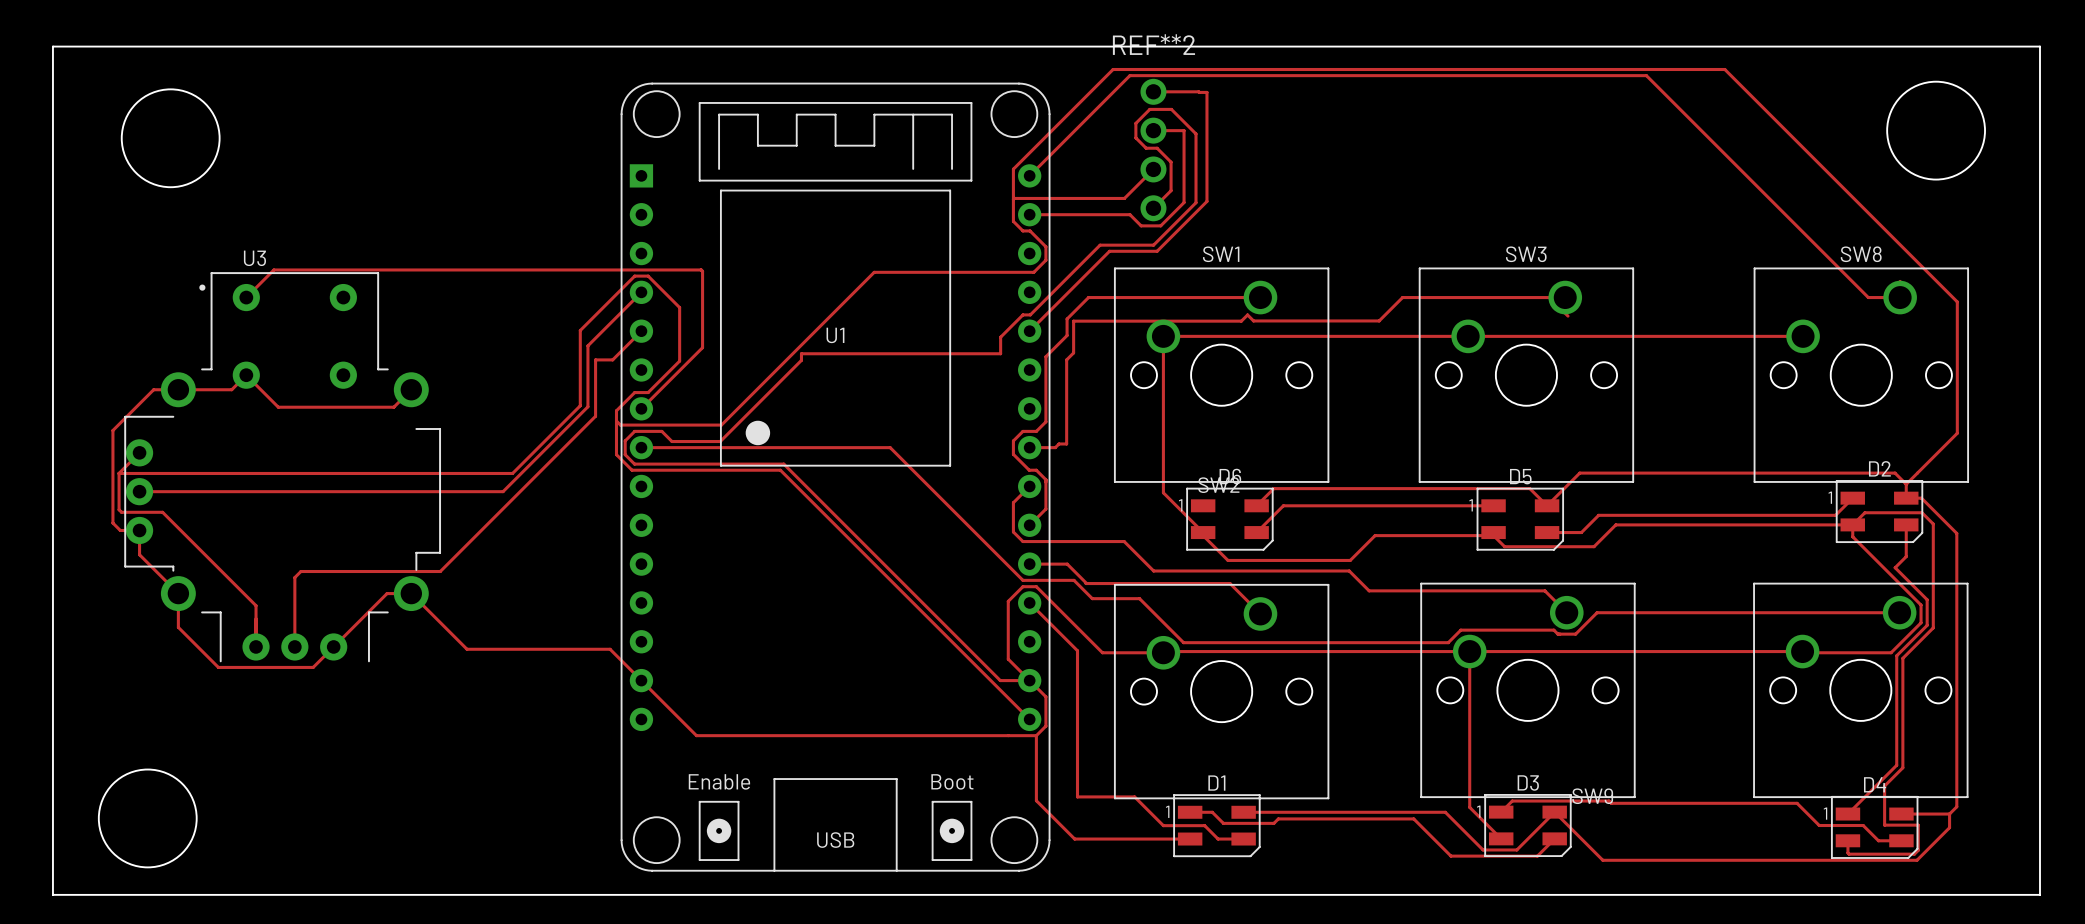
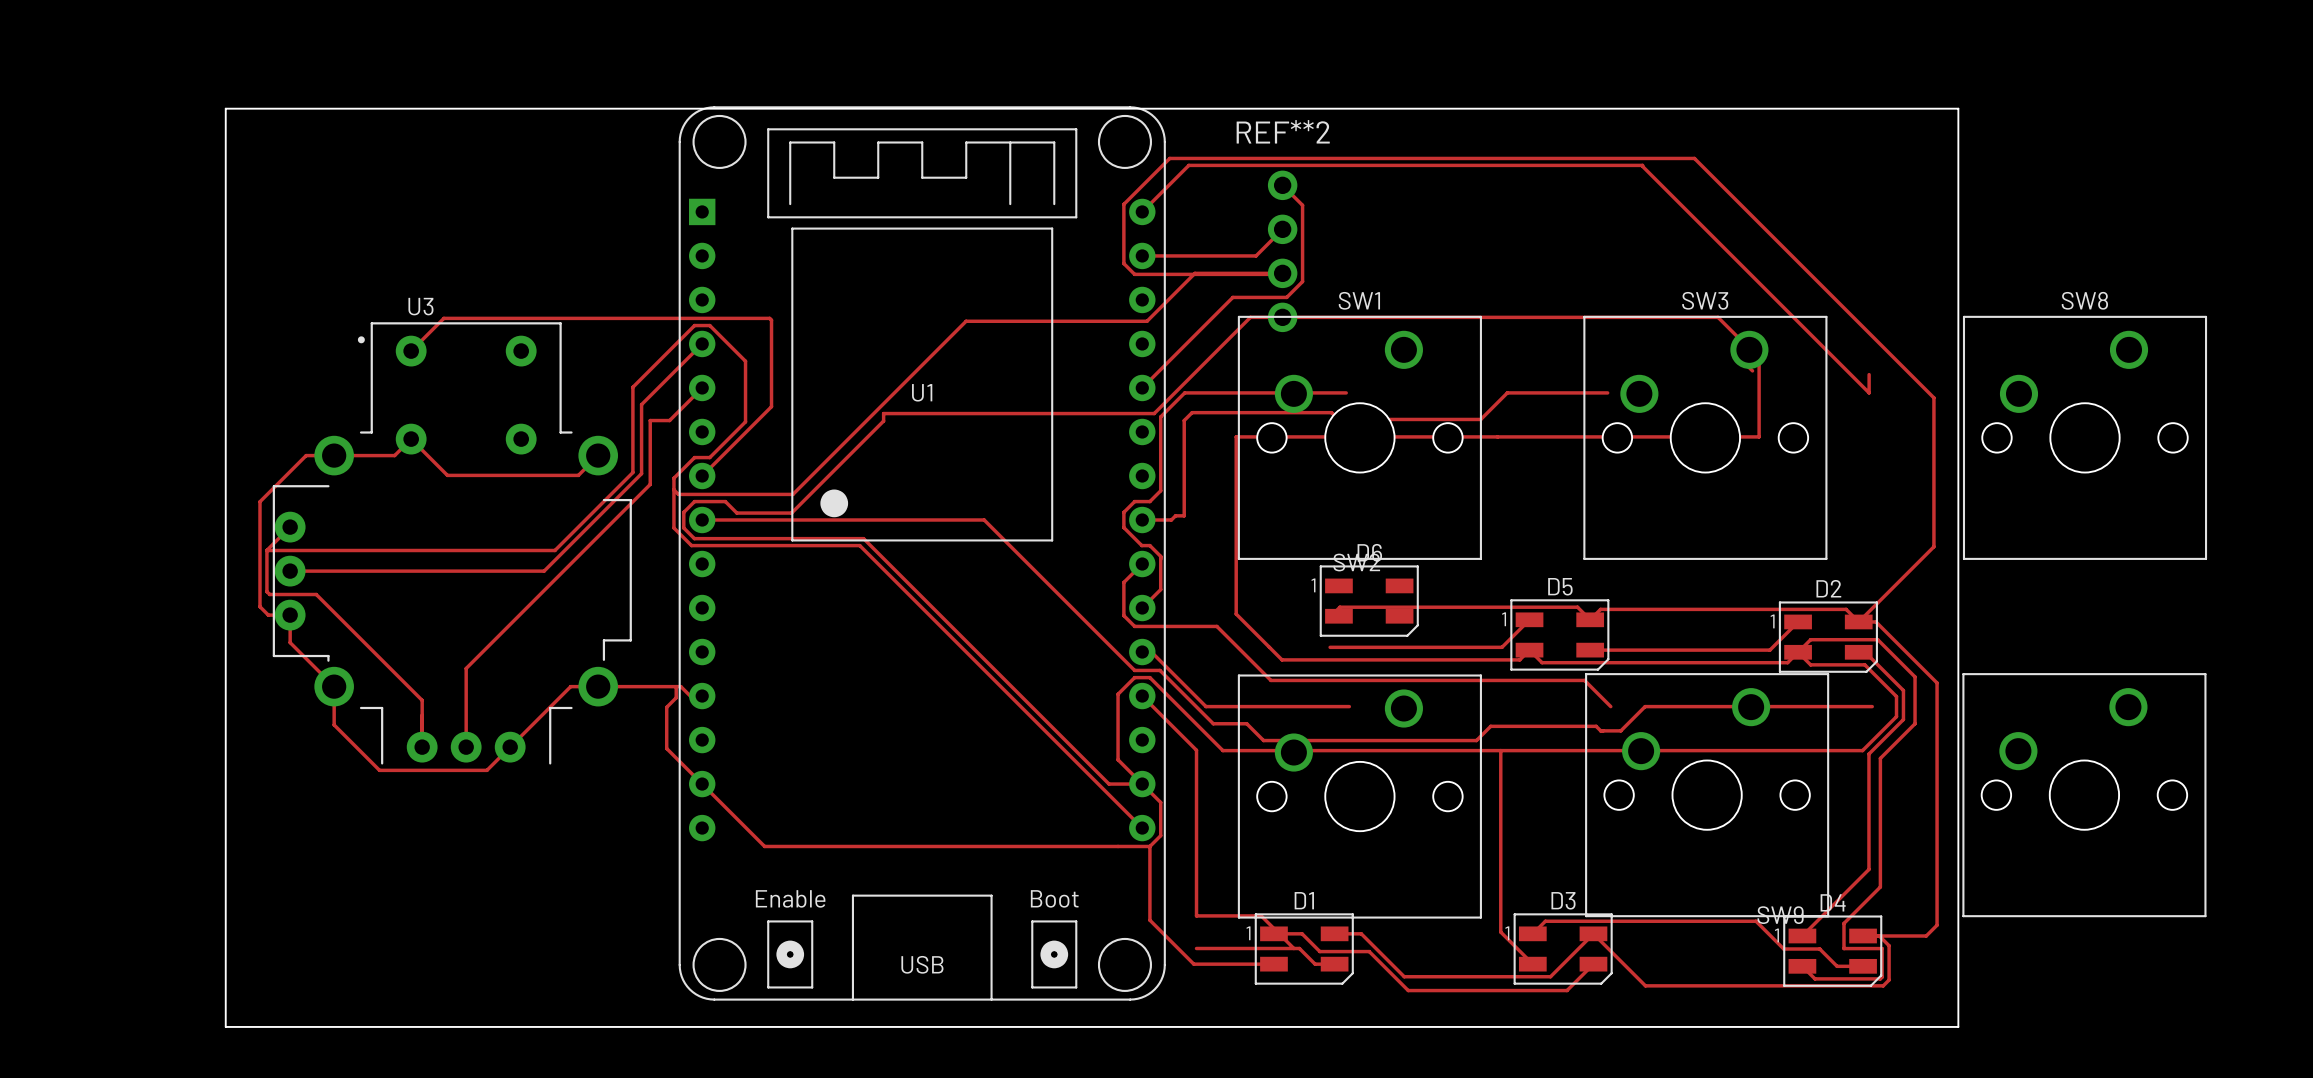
round board edge: [1886, 81, 1986, 180] -> none
round board edge: [121, 88, 221, 188] -> none
track: (1153, 91) (1206, 92) (1206, 201) (1171, 237) -> none
track: (1053, 128) (1113, 69) (1724, 69) (1957, 301) (1957, 433) (1906, 484) -> (1169, 158) (1694, 158) (1933, 397) (1933, 546) (1858, 621)
track: (1153, 130) (1184, 130) (1184, 202) (1160, 225) (1141, 225) (1130, 214) -> (1282, 229) (1256, 255)
track: (1070, 134) (1129, 75) (1646, 75) (1868, 297) (1900, 297) (1900, 281) -> (1188, 165) (1642, 165) (1869, 392) (1869, 374)
REF**2 position: (1153, 150) -> (1282, 251)
track: (1153, 169) (1124, 198) (1013, 199) -> none
track: (1171, 170) (1171, 162) (1157, 148) (1146, 148) (1135, 137) (1135, 123) (1149, 109) (1171, 109) (1196, 133) (1196, 202) (1153, 245) (1100, 245) (1030, 314) (1022, 314) (1000, 337) (1000, 353) -> (1302, 205) (1282, 185)
track: (1171, 190) (1153, 208) -> (1302, 228) (1302, 281)
track: (1030, 230) (1045, 246) (1045, 260) -> (1142, 274) (1281, 274) (1282, 273) (1194, 273) (1160, 307)
track: (701, 269) (273, 269) (246, 297) -> (769, 318) (443, 318) (411, 351)
track: (1260, 297) (1088, 297) (1067, 319) (1067, 335) -> (1346, 392) (1184, 392)
track: (1565, 297) (1402, 297) (1379, 320) (1253, 320) (1247, 314) (1241, 321) (1073, 321) (1073, 352) -> (1607, 392) (1507, 392) (1480, 419) (1338, 419) (1331, 412) (1192, 412)
track: (1803, 336) (1163, 336) (1163, 492) (1203, 532) -> none
track: (411, 389) (393, 407) (278, 407) (246, 375) (231, 389) (153, 389) (112, 430) (112, 523) (120, 530) (139, 530) (139, 554) (178, 593) (178, 627) (218, 667) (313, 667) (387, 593) (411, 593) (467, 649) (610, 649) -> (676, 686) (676, 697) (666, 707) (666, 748)
track: none -> (598, 455) (578, 475) (447, 475) (411, 439) (394, 455) (306, 455) (259, 501) (259, 606) (268, 615) (290, 615) (290, 642) (334, 686) (334, 724) (379, 770) (486, 770) (570, 686) (680, 686) (696, 701)
track: (139, 452) (119, 473) (119, 509) (121, 512) (162, 512) (256, 605) (256, 646) -> (290, 527) (266, 550) (266, 591) (269, 594) (316, 594) (422, 700) (422, 747)
U3 position: (282, 467) -> (452, 543)
track: (119, 473) (512, 473) -> (266, 550) (556, 549)
track: (1906, 484) (1895, 473) (1579, 473) (1547, 505) (1529, 488) (1273, 488) (1256, 505) -> none
track: (1906, 484) (1906, 498) (1921, 498) (1956, 533) (1956, 806) (1949, 814) -> none
track: (139, 491) (503, 491) -> (290, 571) (545, 569)
track: (1852, 498) (1835, 515) (1598, 515) (1581, 532) (1547, 532) -> none
track: (1489, 510) (1493, 505) (1283, 505) (1256, 532) -> none
D2 position: (1879, 511) -> (1828, 637)
D5 position: (1520, 519) -> (1559, 634)
track: (1852, 524) (1864, 512) (1922, 512) (1933, 524) (1933, 627) (1902, 658) (1902, 767) (1884, 786) (1884, 825) (1918, 825) (1918, 850) (1914, 854) (1849, 854) (1847, 840) -> none
track: (1852, 524) (1852, 536) (1921, 605) (1921, 622) (1891, 652) (1804, 652) -> none
track: (1852, 524) (1615, 524) (1594, 546) (1504, 546) (1493, 535) (1375, 535) (1350, 560) (1227, 560) (1203, 535) -> none
track: (1906, 524) (1906, 556) (1895, 567) (1927, 599) (1927, 625) (1896, 655) (1896, 765) (1847, 814) -> none
track: none -> (1330, 617) (1339, 607) (1577, 607) (1590, 619) (1600, 609) (1846, 609) (1858, 621)
track: none -> (1529, 619) (1502, 647) (1330, 647)
track: none -> (1798, 621) (1769, 650) (1590, 650)
track: none -> (1858, 621) (1876, 621) (1937, 682) (1937, 925) (1926, 936) (1863, 936)
track: (1095, 541) (1124, 541) (1153, 570) -> (1109, 413) (1154, 413) (1250, 317) (1718, 317) (1759, 358) (1759, 436) (1236, 436) (1236, 614) (1282, 659)
track: none -> (1216, 626) (1270, 680) (1584, 680) (1610, 706)
track: (1037, 564) (1067, 564) (1086, 583) -> (1151, 652) (1206, 706) (1349, 706)
track: none -> (1858, 652) (1865, 652) (1903, 690) (1903, 719) (1868, 754) (1868, 869) (1802, 936)
track: (1349, 570) (1369, 590) (1544, 590) (1566, 612) -> (1504, 659) (1519, 659) (1529, 650) (1542, 662) (1787, 662) (1810, 639) (1877, 639) (1915, 676) (1915, 723) (1880, 758) (1880, 887) (1843, 923) (1843, 948) (1882, 948) (1882, 977) (1880, 978) (1815, 978) (1802, 966)
track: (440, 571) (300, 571) (294, 577) (294, 646) -> (474, 660) (466, 668) (466, 747)
track: (1045, 580) (1074, 580) (1092, 598) (1139, 598) (1183, 642) (1448, 642) (1460, 630) (1553, 630) (1557, 634) (1575, 634) (1597, 612) (1899, 612) -> (1160, 670) (1213, 723) (1246, 723) (1263, 740) (1476, 740) (1490, 726) (1596, 726) (1600, 730) (1620, 730) (1645, 706) (1872, 706)
track: (1085, 583) (1230, 583) (1260, 613) -> none
track: (1100, 651) (1102, 652) (1802, 651) -> (1222, 750) (1862, 750) (1896, 716) (1896, 696) (1864, 664) (1810, 664) (1798, 652)
track: none -> (1500, 750) (1500, 932) (1532, 964)
track: (1469, 651) (1469, 807) (1501, 838) -> none
round board edge: [98, 769, 198, 868] -> none
track: none -> (1273, 933) (1302, 933) (1319, 951) (1369, 951) (1408, 990) (1567, 990) (1593, 964)
track: (1190, 812) (1212, 812) (1223, 823) (1273, 823) (1278, 818) (1413, 818) (1450, 856) (1537, 856) (1554, 838) -> none
track: none -> (1334, 933) (1361, 933) (1404, 976) (1550, 976) (1593, 933) (1645, 985) (1883, 985) (1889, 980) (1889, 945) (1879, 936)
track: (1243, 812) (1445, 812) (1483, 849) (1516, 849) (1554, 812) (1602, 860) (1916, 860) (1949, 827) (1949, 814) -> none
track: none -> (1532, 933) (1545, 921) (1756, 921) (1783, 948) (1819, 948) (1837, 966) (1863, 966)
track: (1501, 812) (1512, 801) (1797, 803) (1819, 825) (1863, 825) (1878, 840) (1901, 840) -> none
track: (1901, 814) (1949, 814) -> none
track: (1168, 825) (1204, 825) (1218, 839) (1243, 839) -> (1299, 948) (1315, 964) (1334, 964)
D1 position: (1216, 825) -> (1304, 948)
D3 position: (1527, 825) -> (1563, 948)
D4 position: (1874, 827) -> (1832, 951)
track: (1074, 839) (1190, 839) -> (1193, 963) (1273, 964)
board edge: (221, 894) (52, 894) (52, 46) (2039, 46) (2039, 894) (1749, 894) -> (225, 1026) (225, 108) (1958, 108) (1958, 1026)

